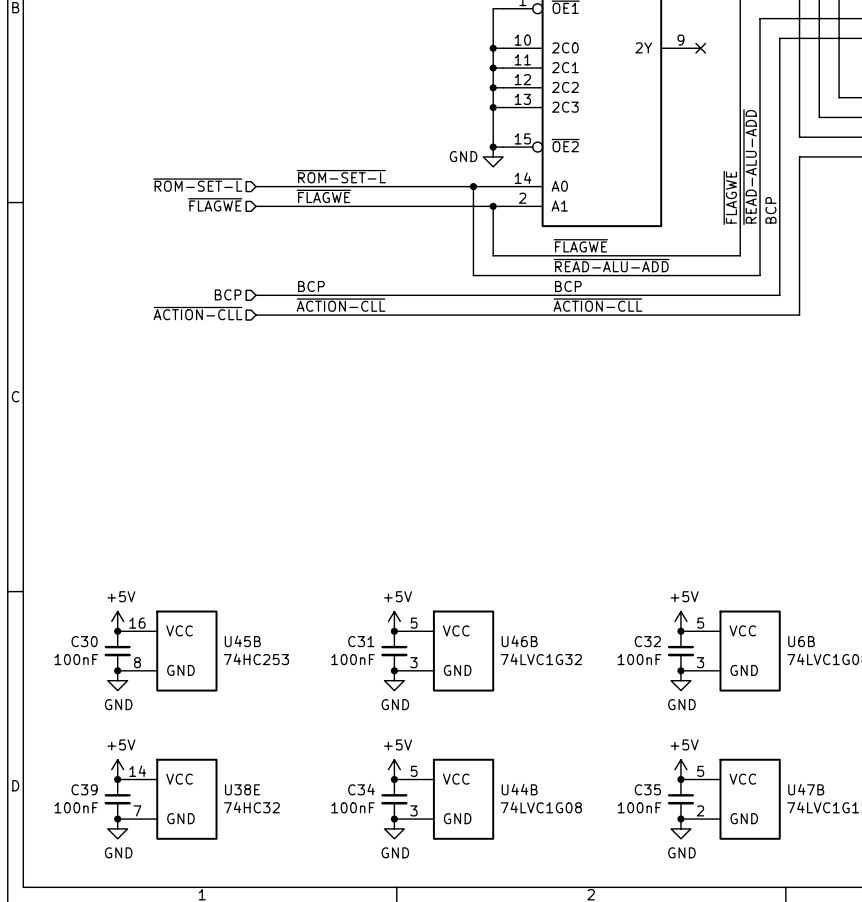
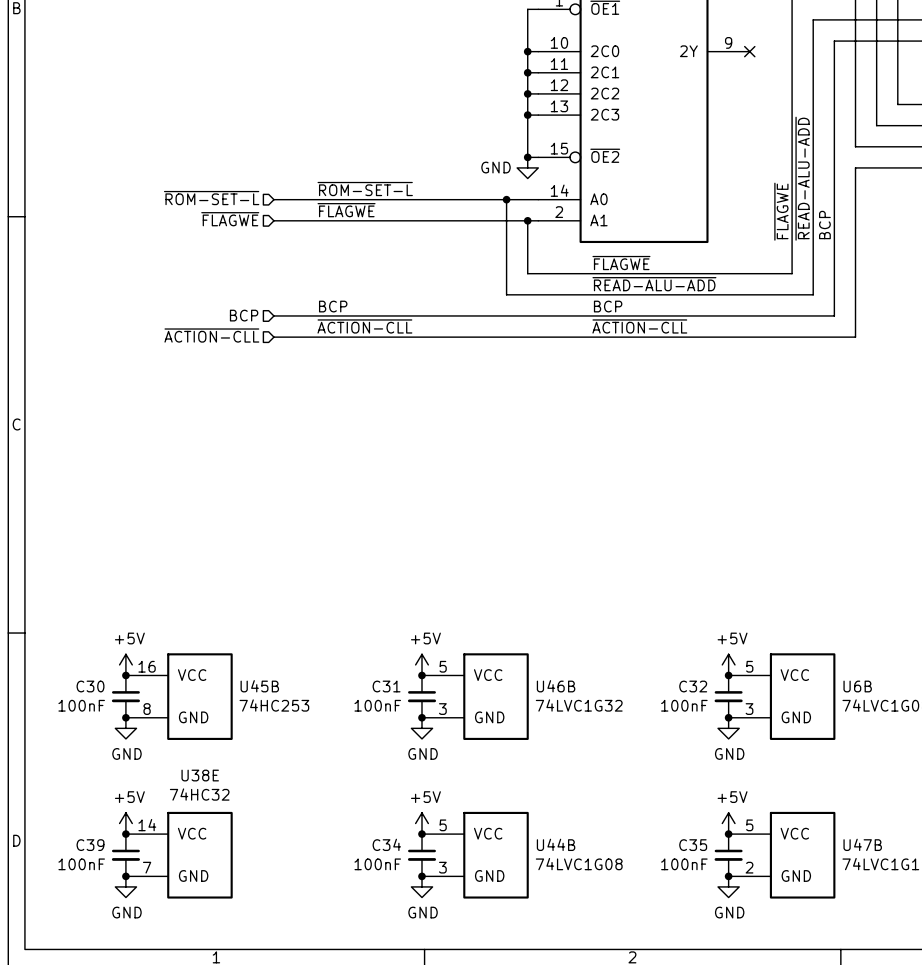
U38E name position: U38E (242, 789) -> U38E (200, 775)
U38E value position: 74HC32 (251, 807) -> 74HC32 (199, 794)

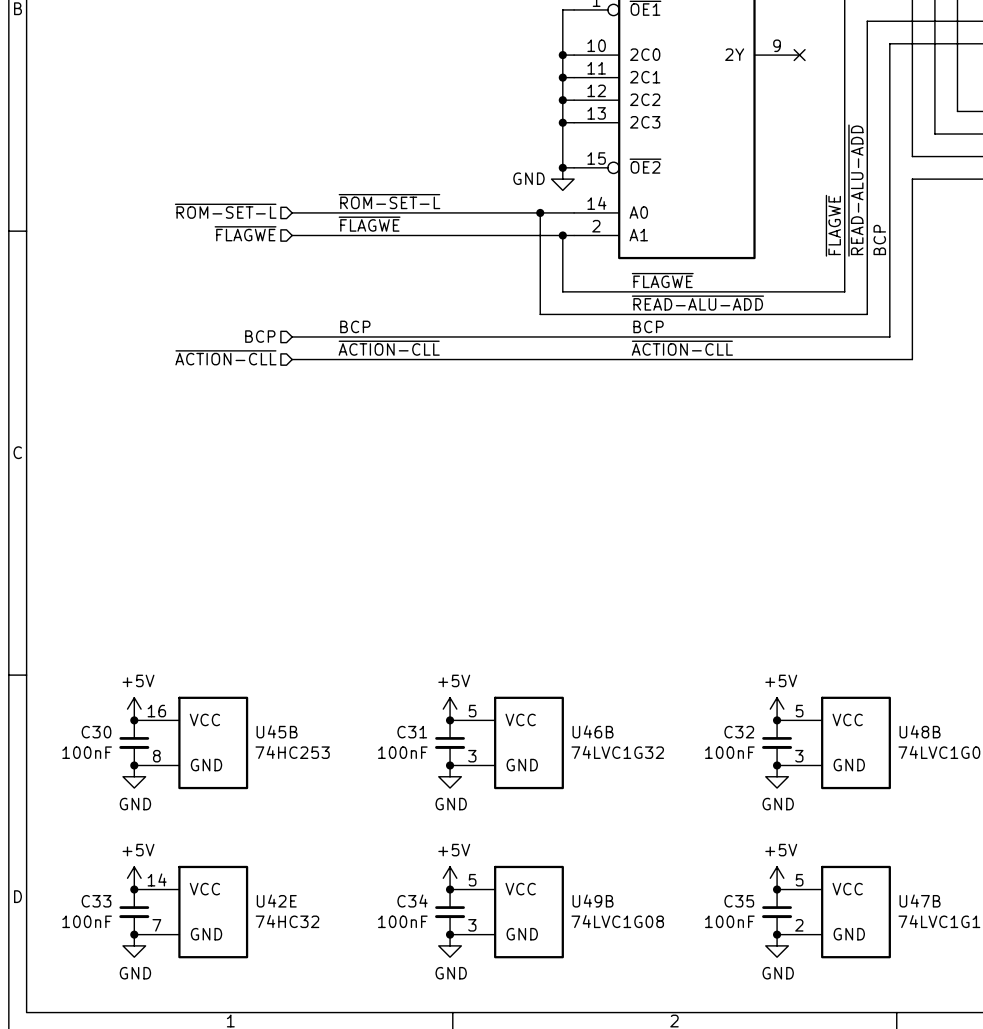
U6B name: U6B (857, 686) -> U48B (920, 731)
U38E name: U38E (200, 775) -> U42E (276, 901)
U38E value position: 74HC32 (199, 794) -> 74HC32 (287, 921)
U44B name: U44B (556, 844) -> U49B (593, 901)
C39 name: C39 (90, 845) -> C33 (96, 901)

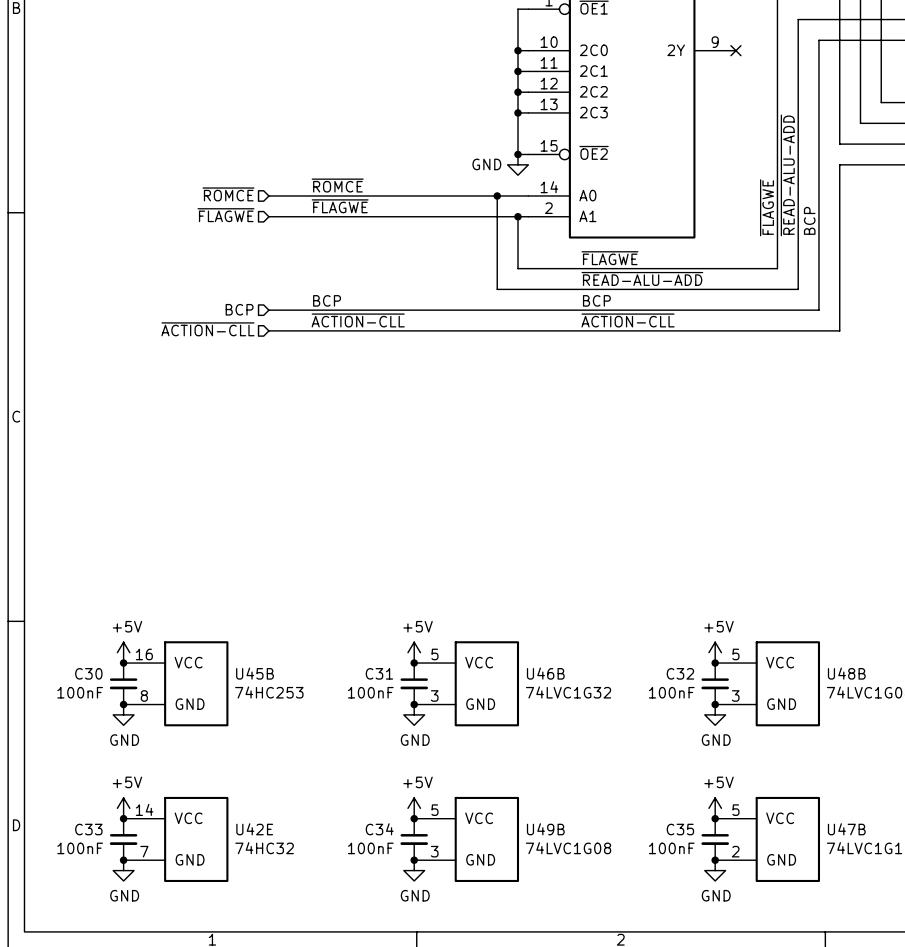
label: ~{ROM-SET-L} (389, 201) -> ~{ROMCE} (337, 185)
hierarchical label: ~{ROM-SET-L} (225, 211) -> ~{ROMCE} (228, 194)

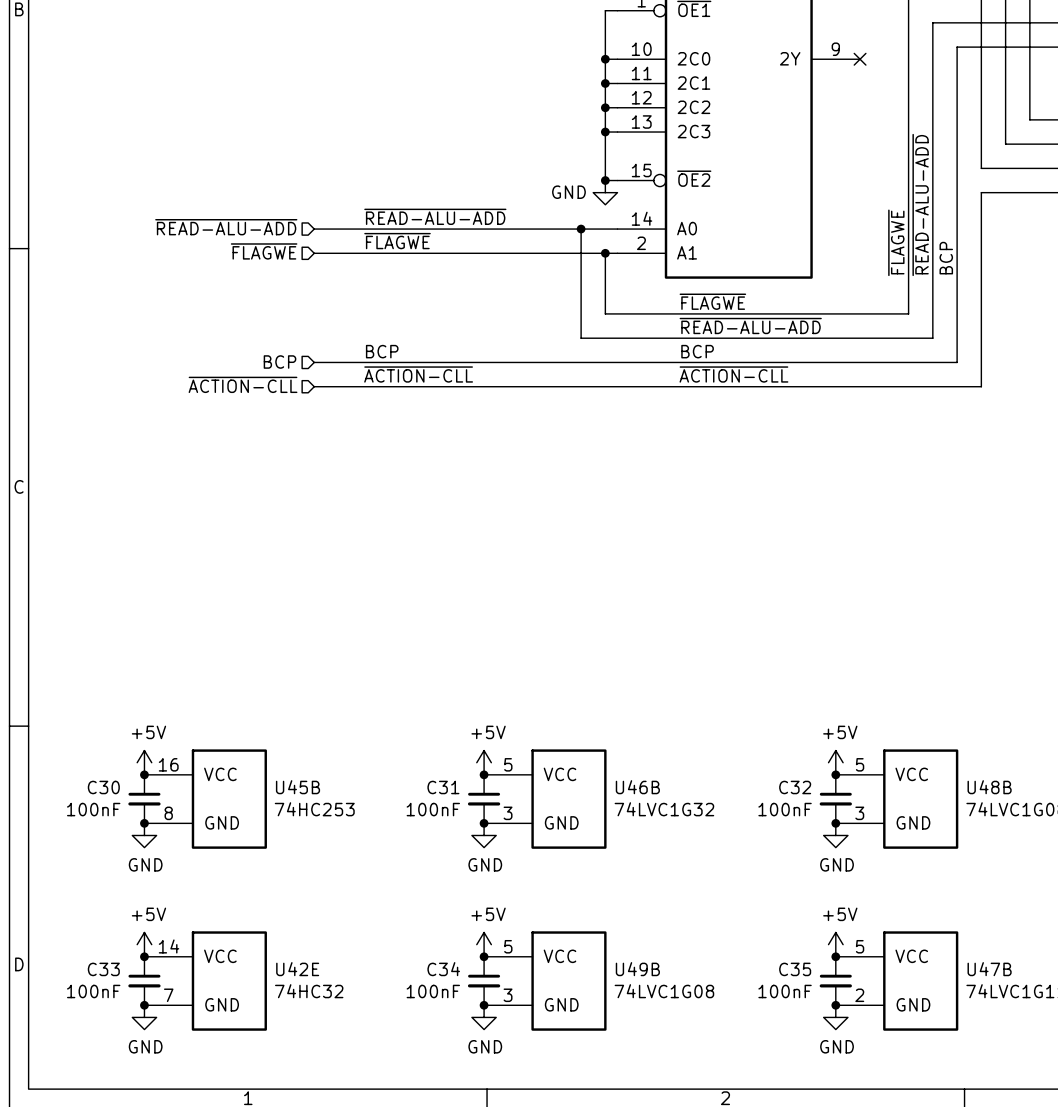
label: ~{ROMCE} (337, 185) -> ~{READ-ALU-ADD} (435, 216)
hierarchical label: ~{ROMCE} (228, 194) -> ~{READ-ALU-ADD} (226, 227)

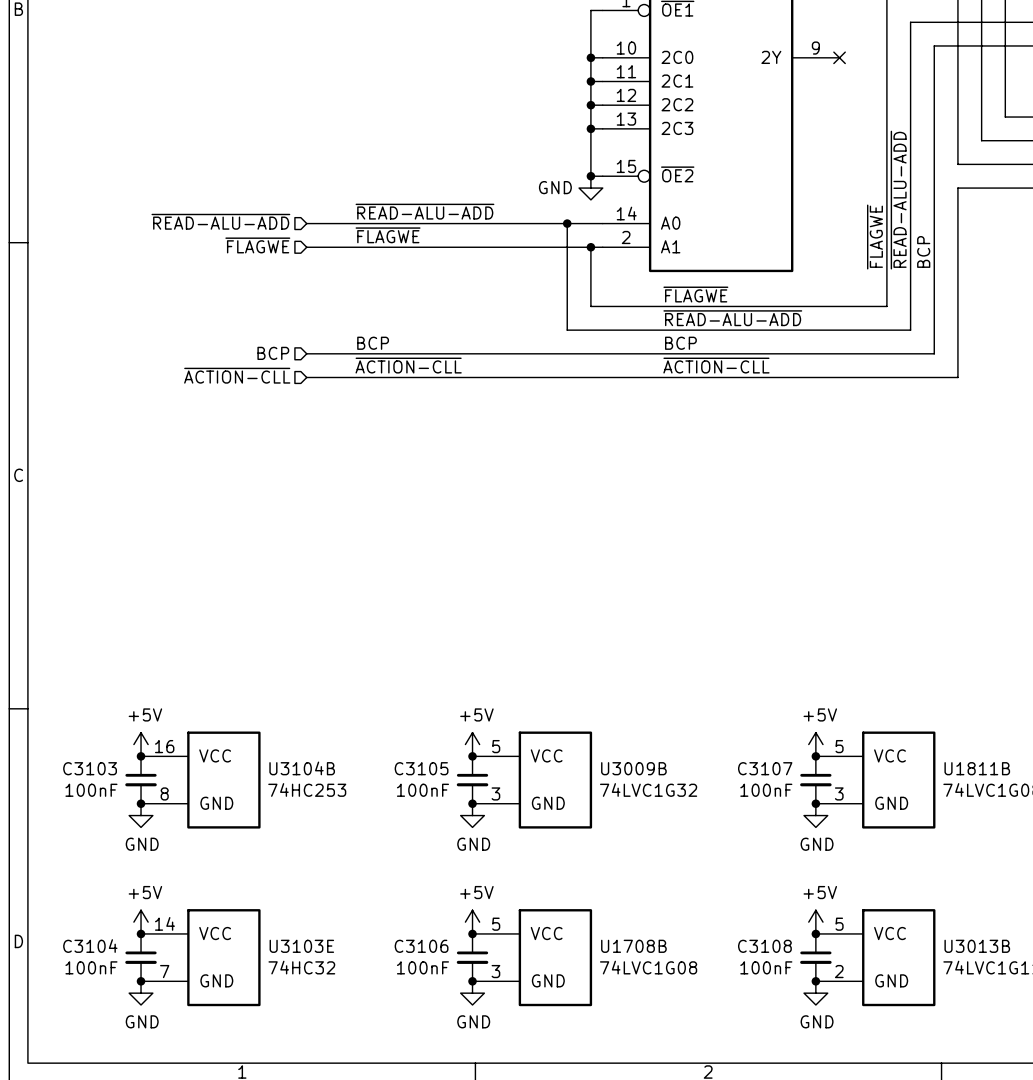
C30 name: C30 (103, 787) -> C3103 (90, 768)
U45B name: U45B (298, 787) -> U3104B (302, 768)
C31 name: C31 (443, 787) -> C3105 (421, 768)
U46B name: U46B (637, 787) -> U3009B (633, 768)
C32 name: C32 (795, 787) -> C3107 (765, 768)
U48B name: U48B (989, 787) -> U1811B (977, 768)
C33 name: C33 (103, 969) -> C3104 (90, 946)
U42E name: U42E (297, 969) -> U3103E (301, 946)
C34 name: C34 (443, 969) -> C3106 (421, 946)
U49B name: U49B (637, 969) -> U1708B (633, 946)
C35 name: C35 (795, 969) -> C3108 (764, 946)
U47B name: U47B (989, 969) -> U3013B (977, 946)

